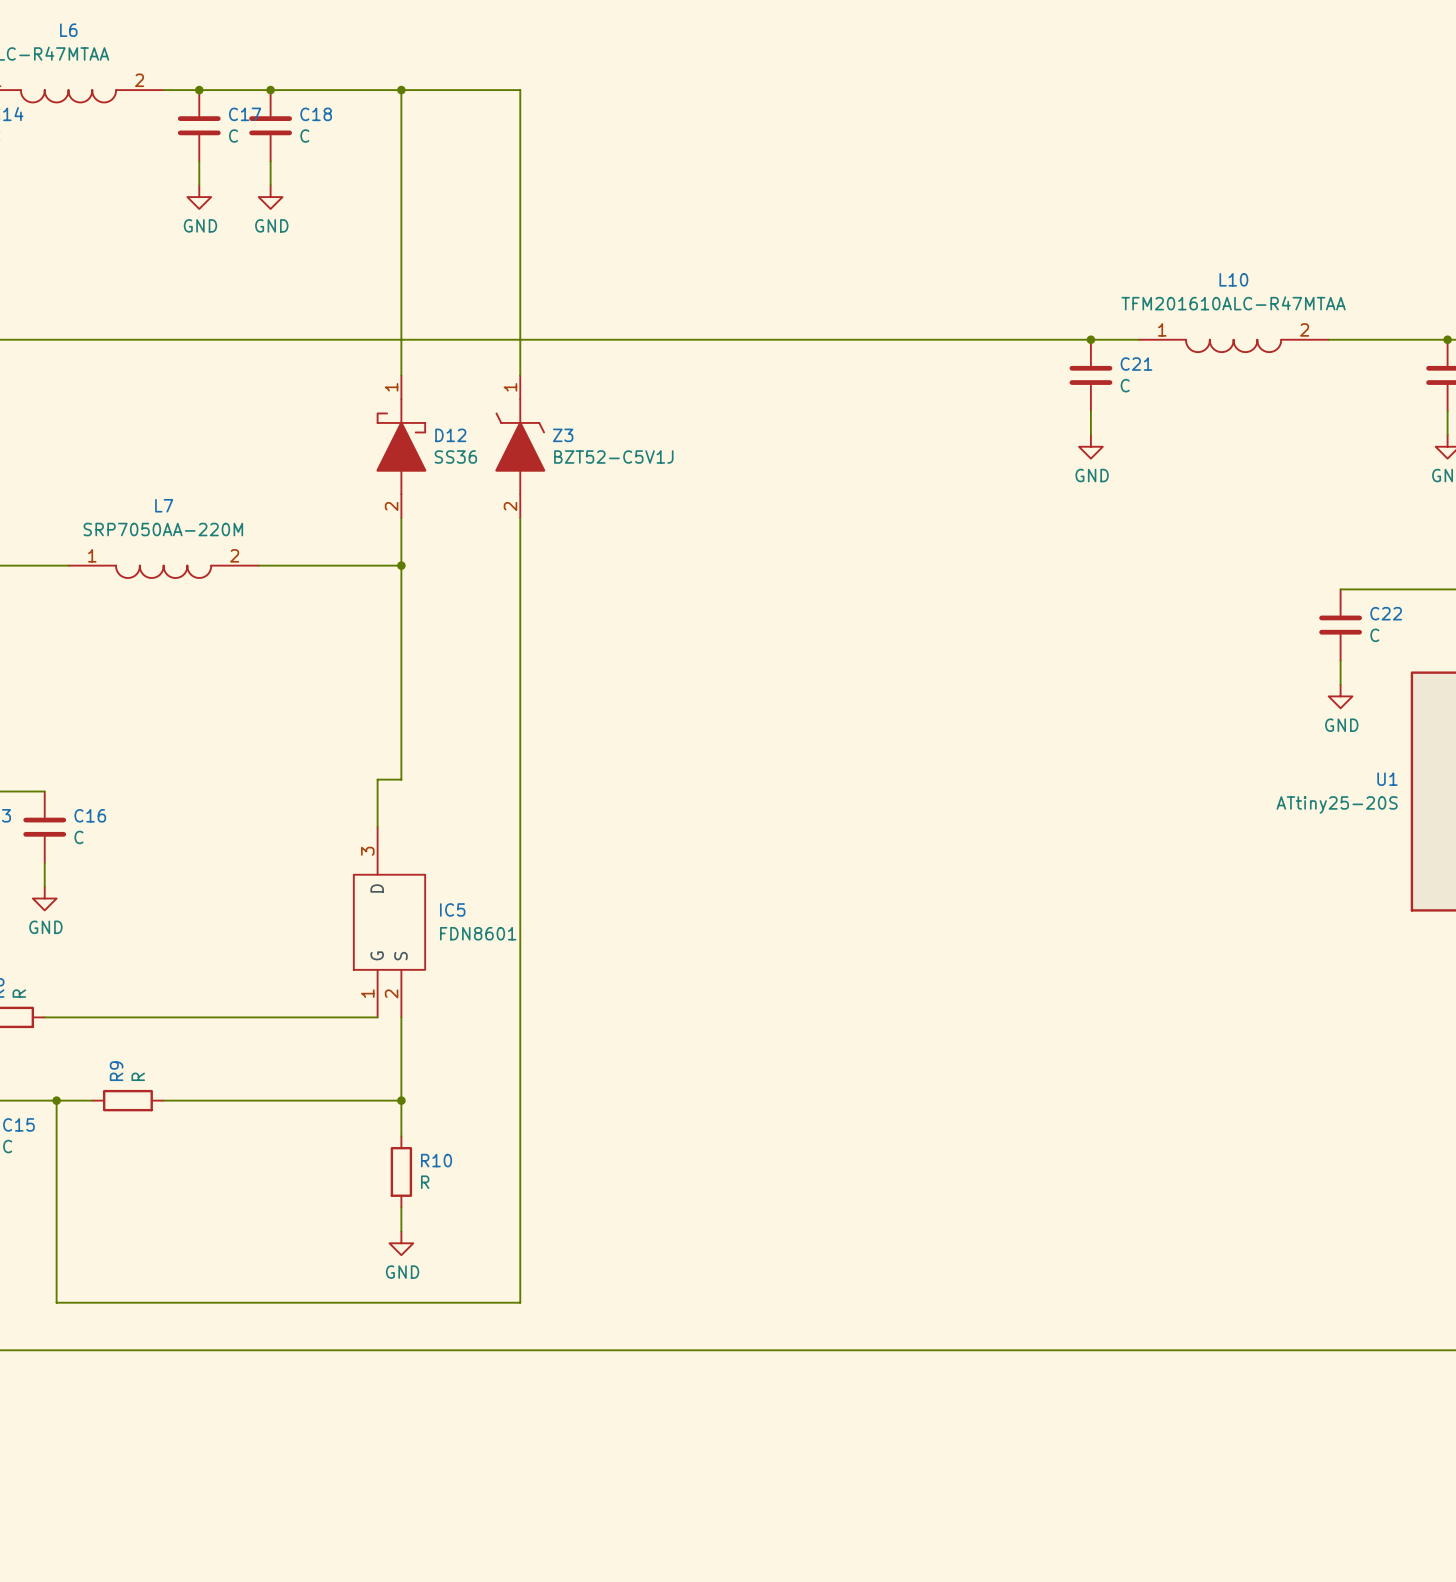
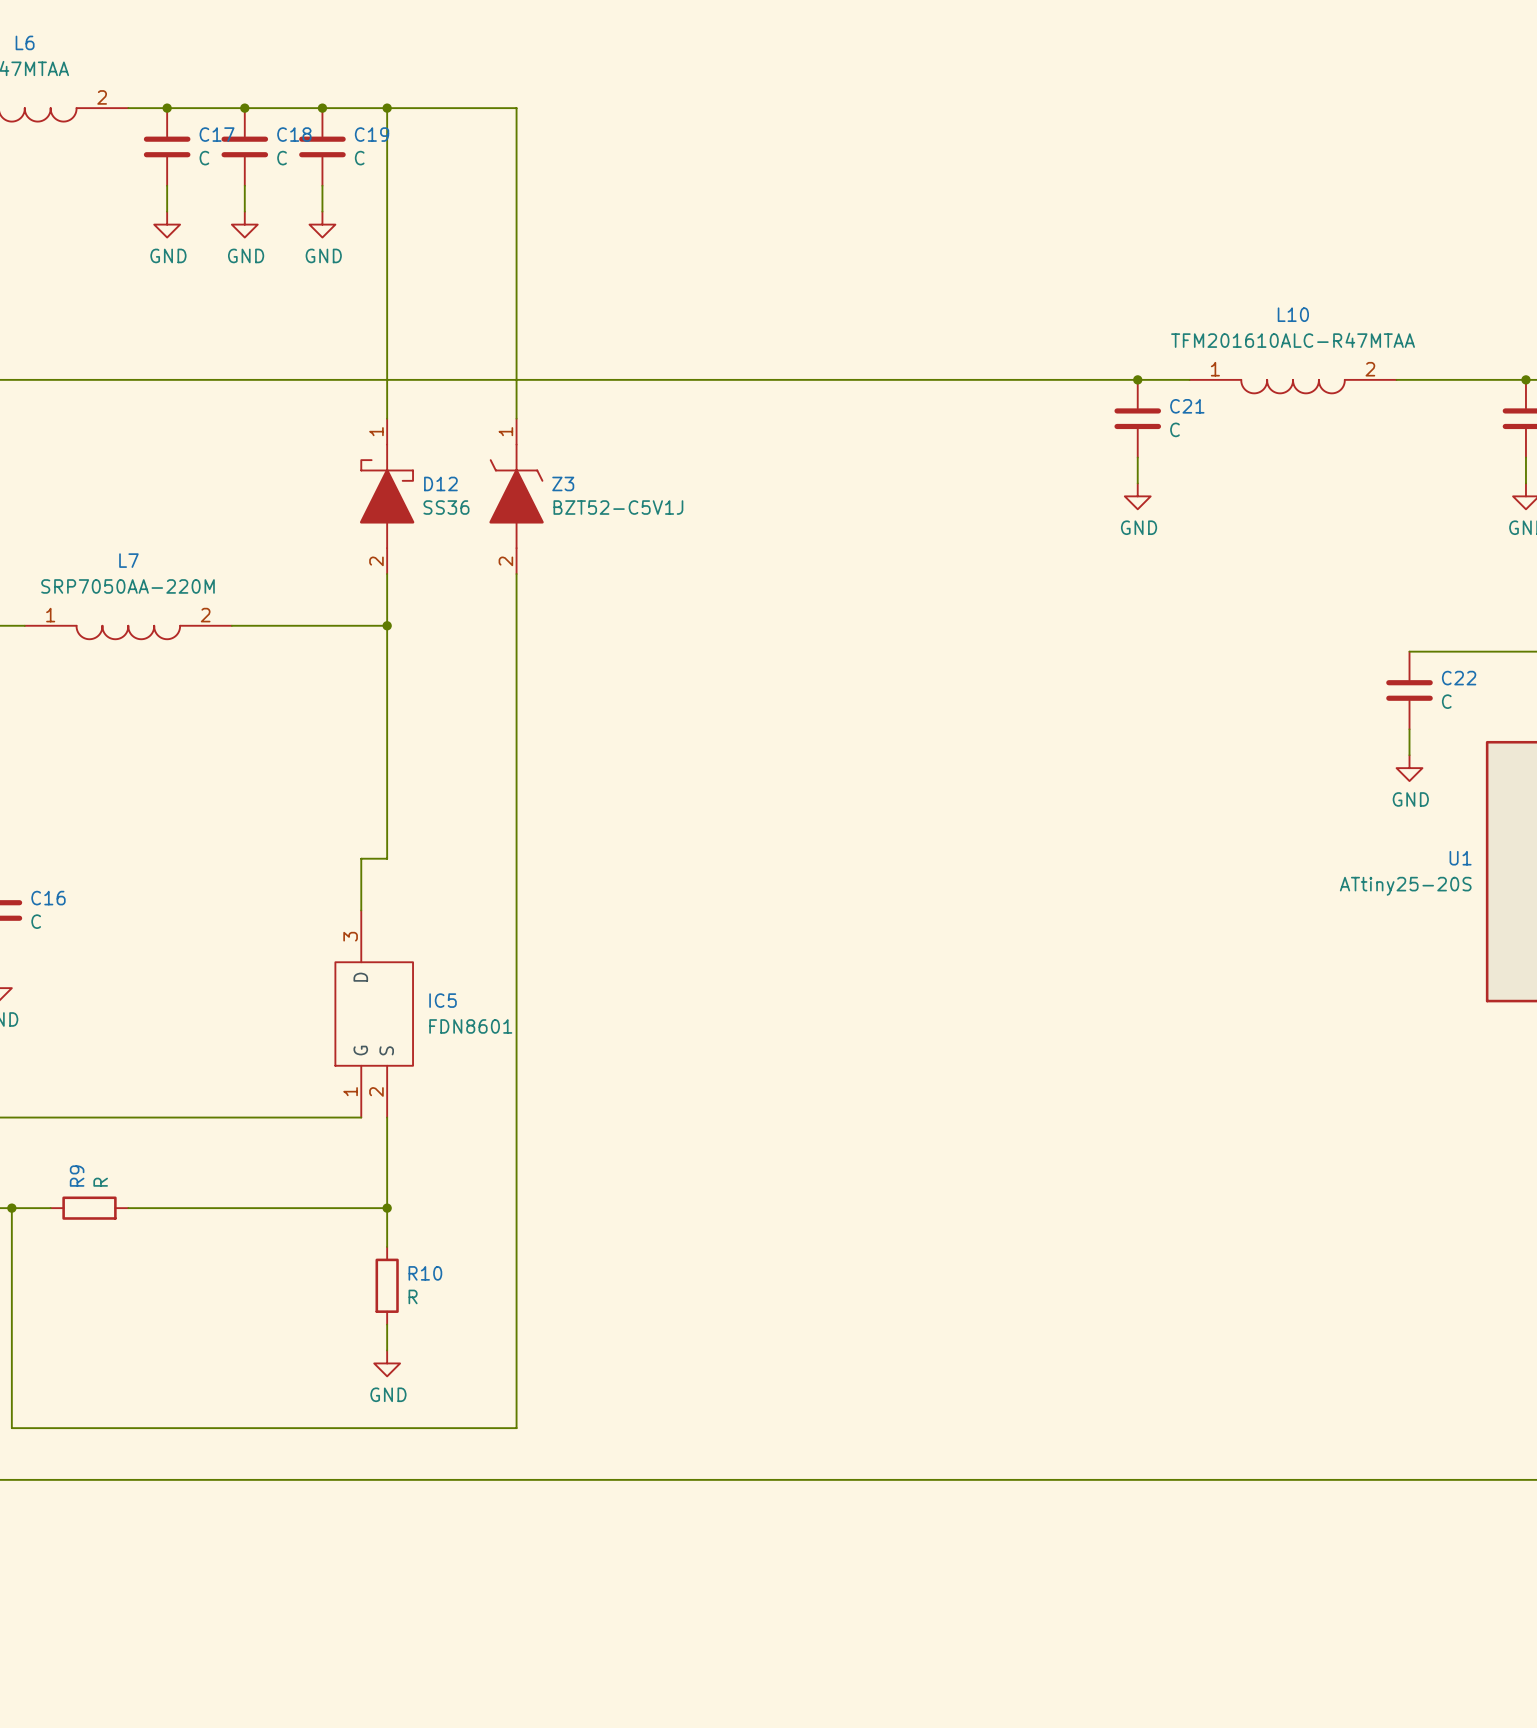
junction: none -> (322, 108)
C19: none -> C (322, 146)
wire: none -> (322, 185) (322, 211)
power symbol: none -> GND (322, 224)

